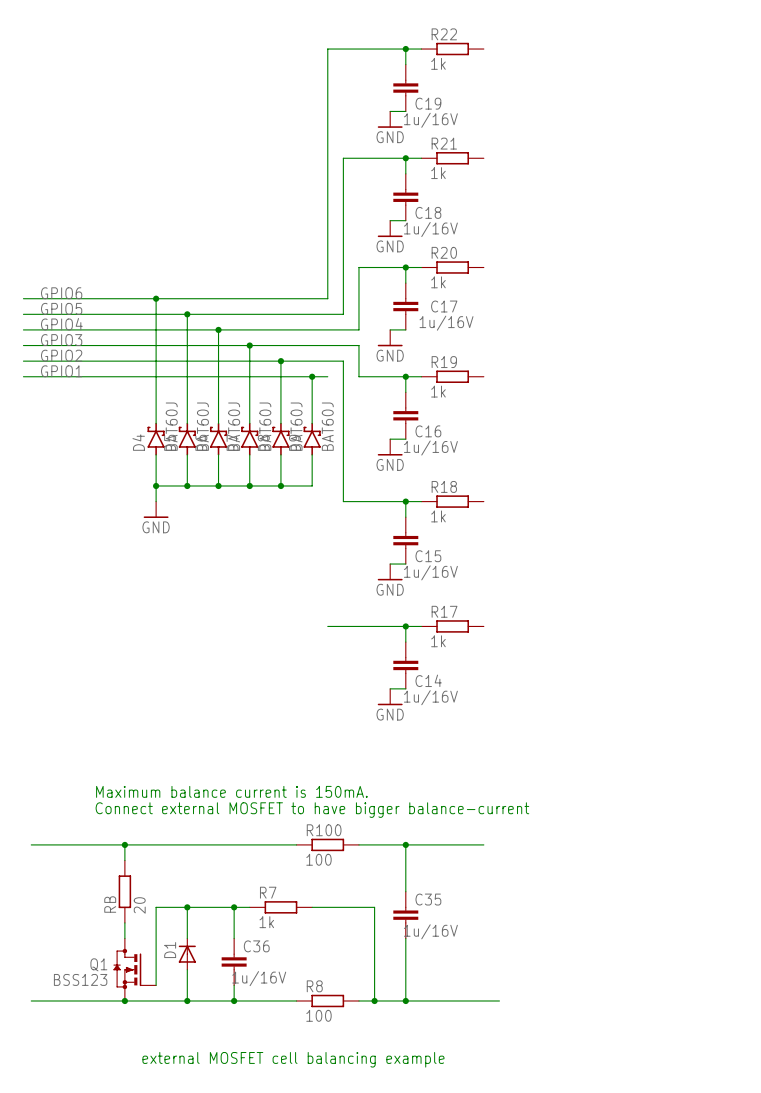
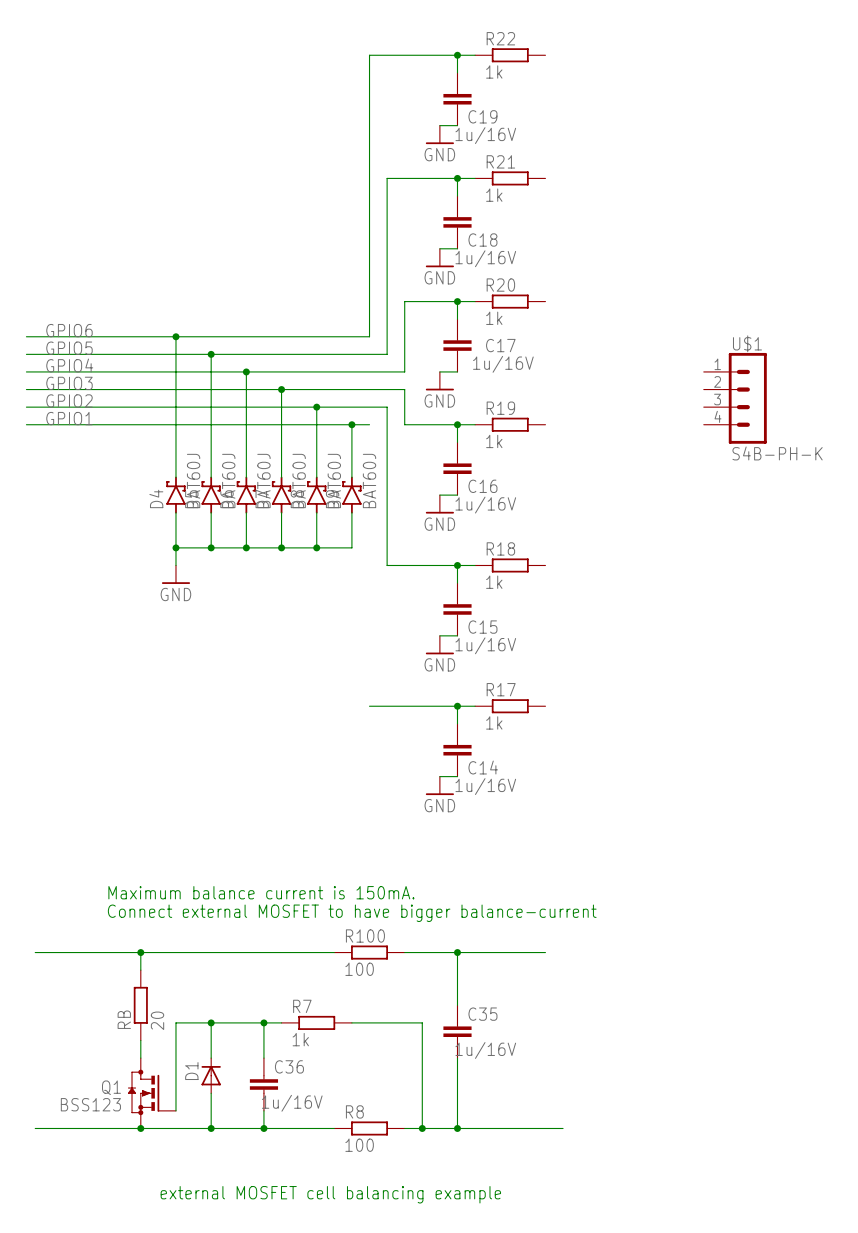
U$1: none -> S4B-PH-K (735, 398)

